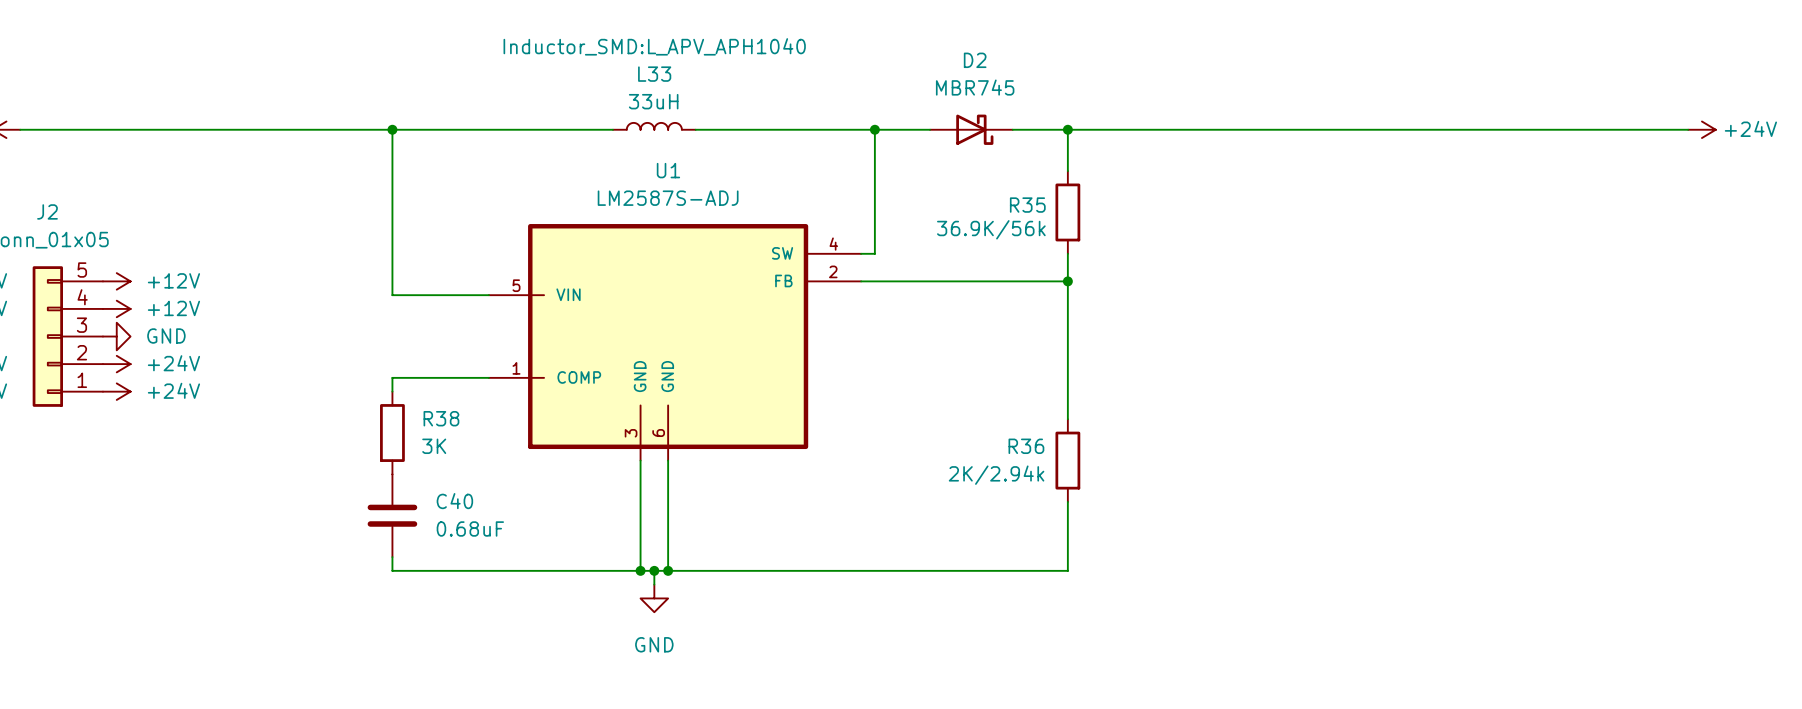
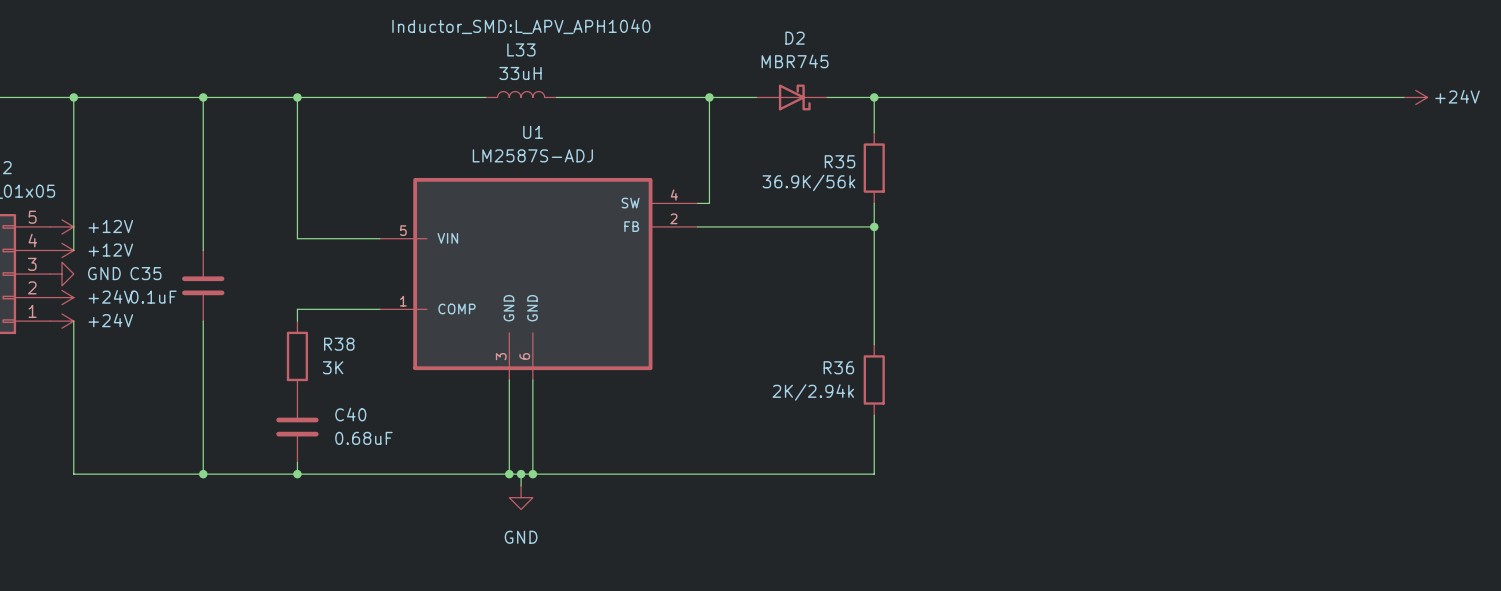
wire: none -> (73, 97) (73, 250)
junction: none -> (73, 97)
wire: none -> (203, 97) (203, 250)
junction: none -> (203, 97)
C35: none -> 0.1uF (203, 285)
wire: none -> (73, 321) (73, 474) (297, 474)
wire: none -> (203, 321) (203, 474)
junction: none -> (203, 474)
junction: none -> (297, 474)

